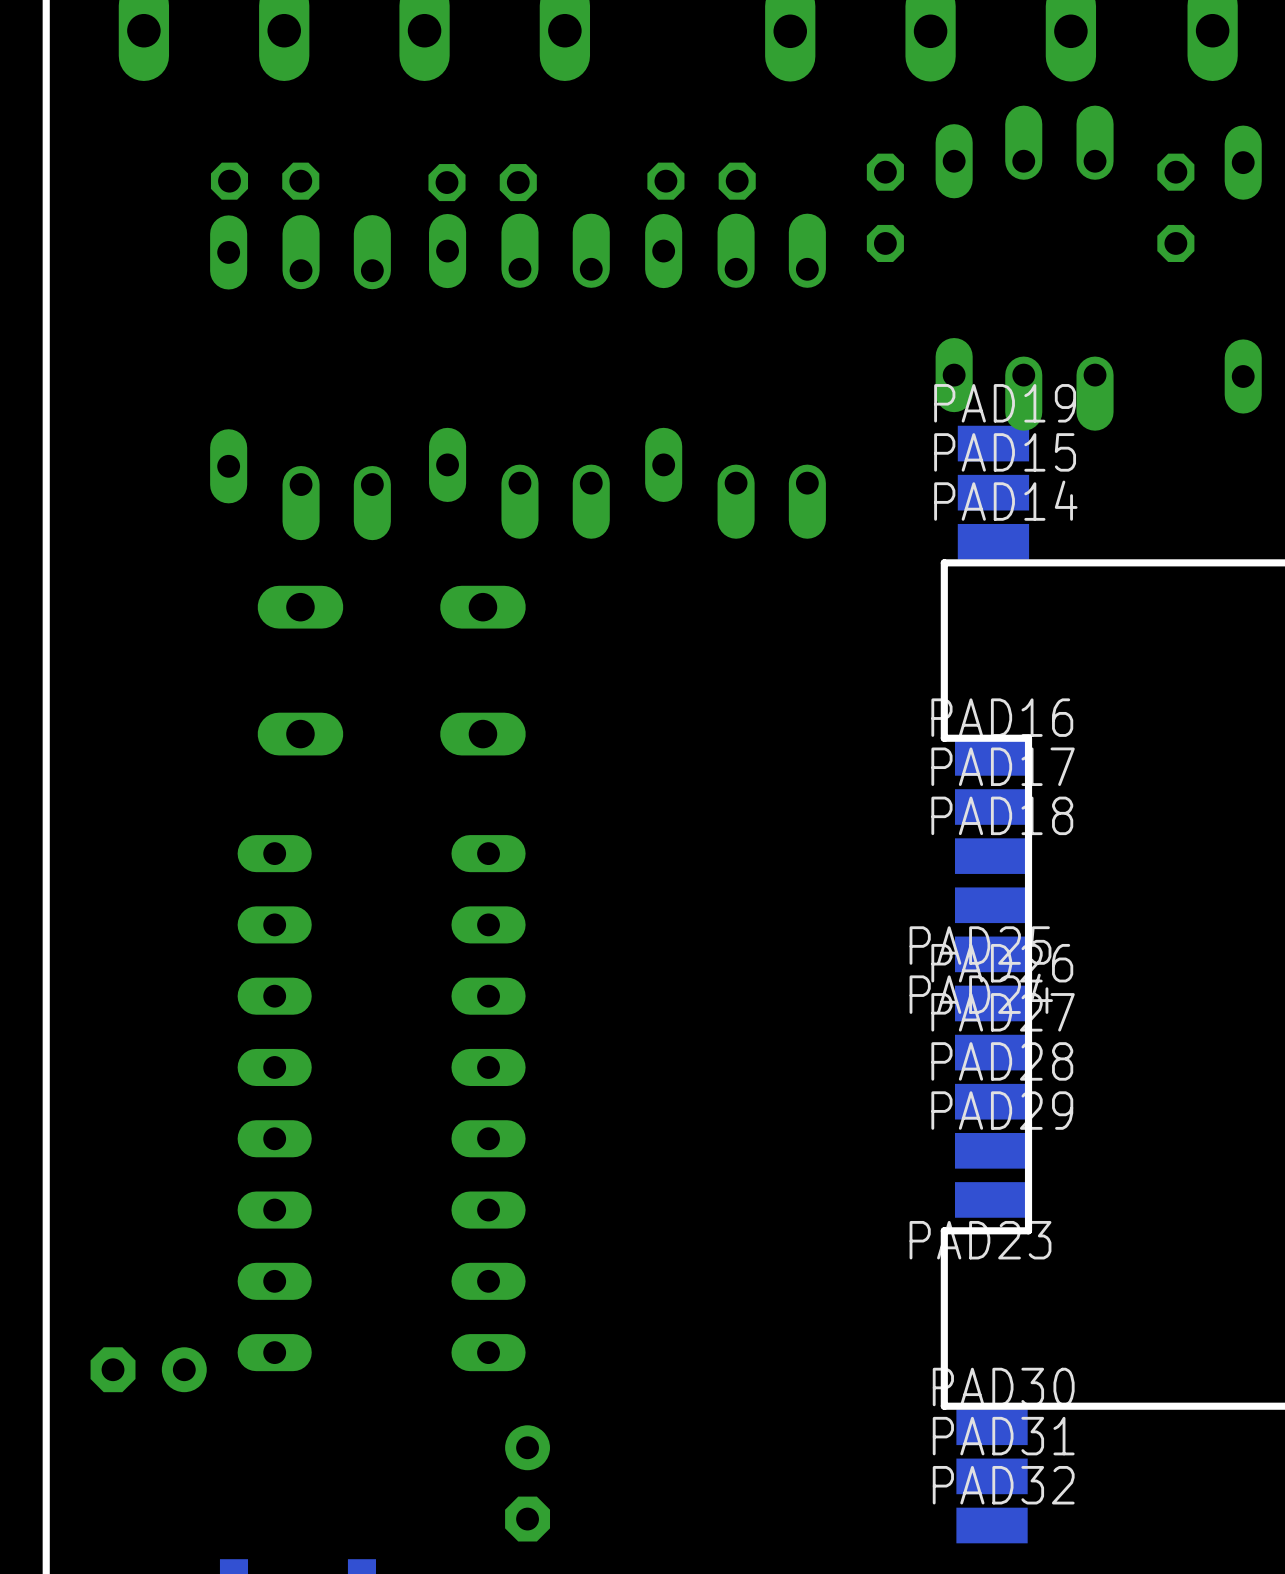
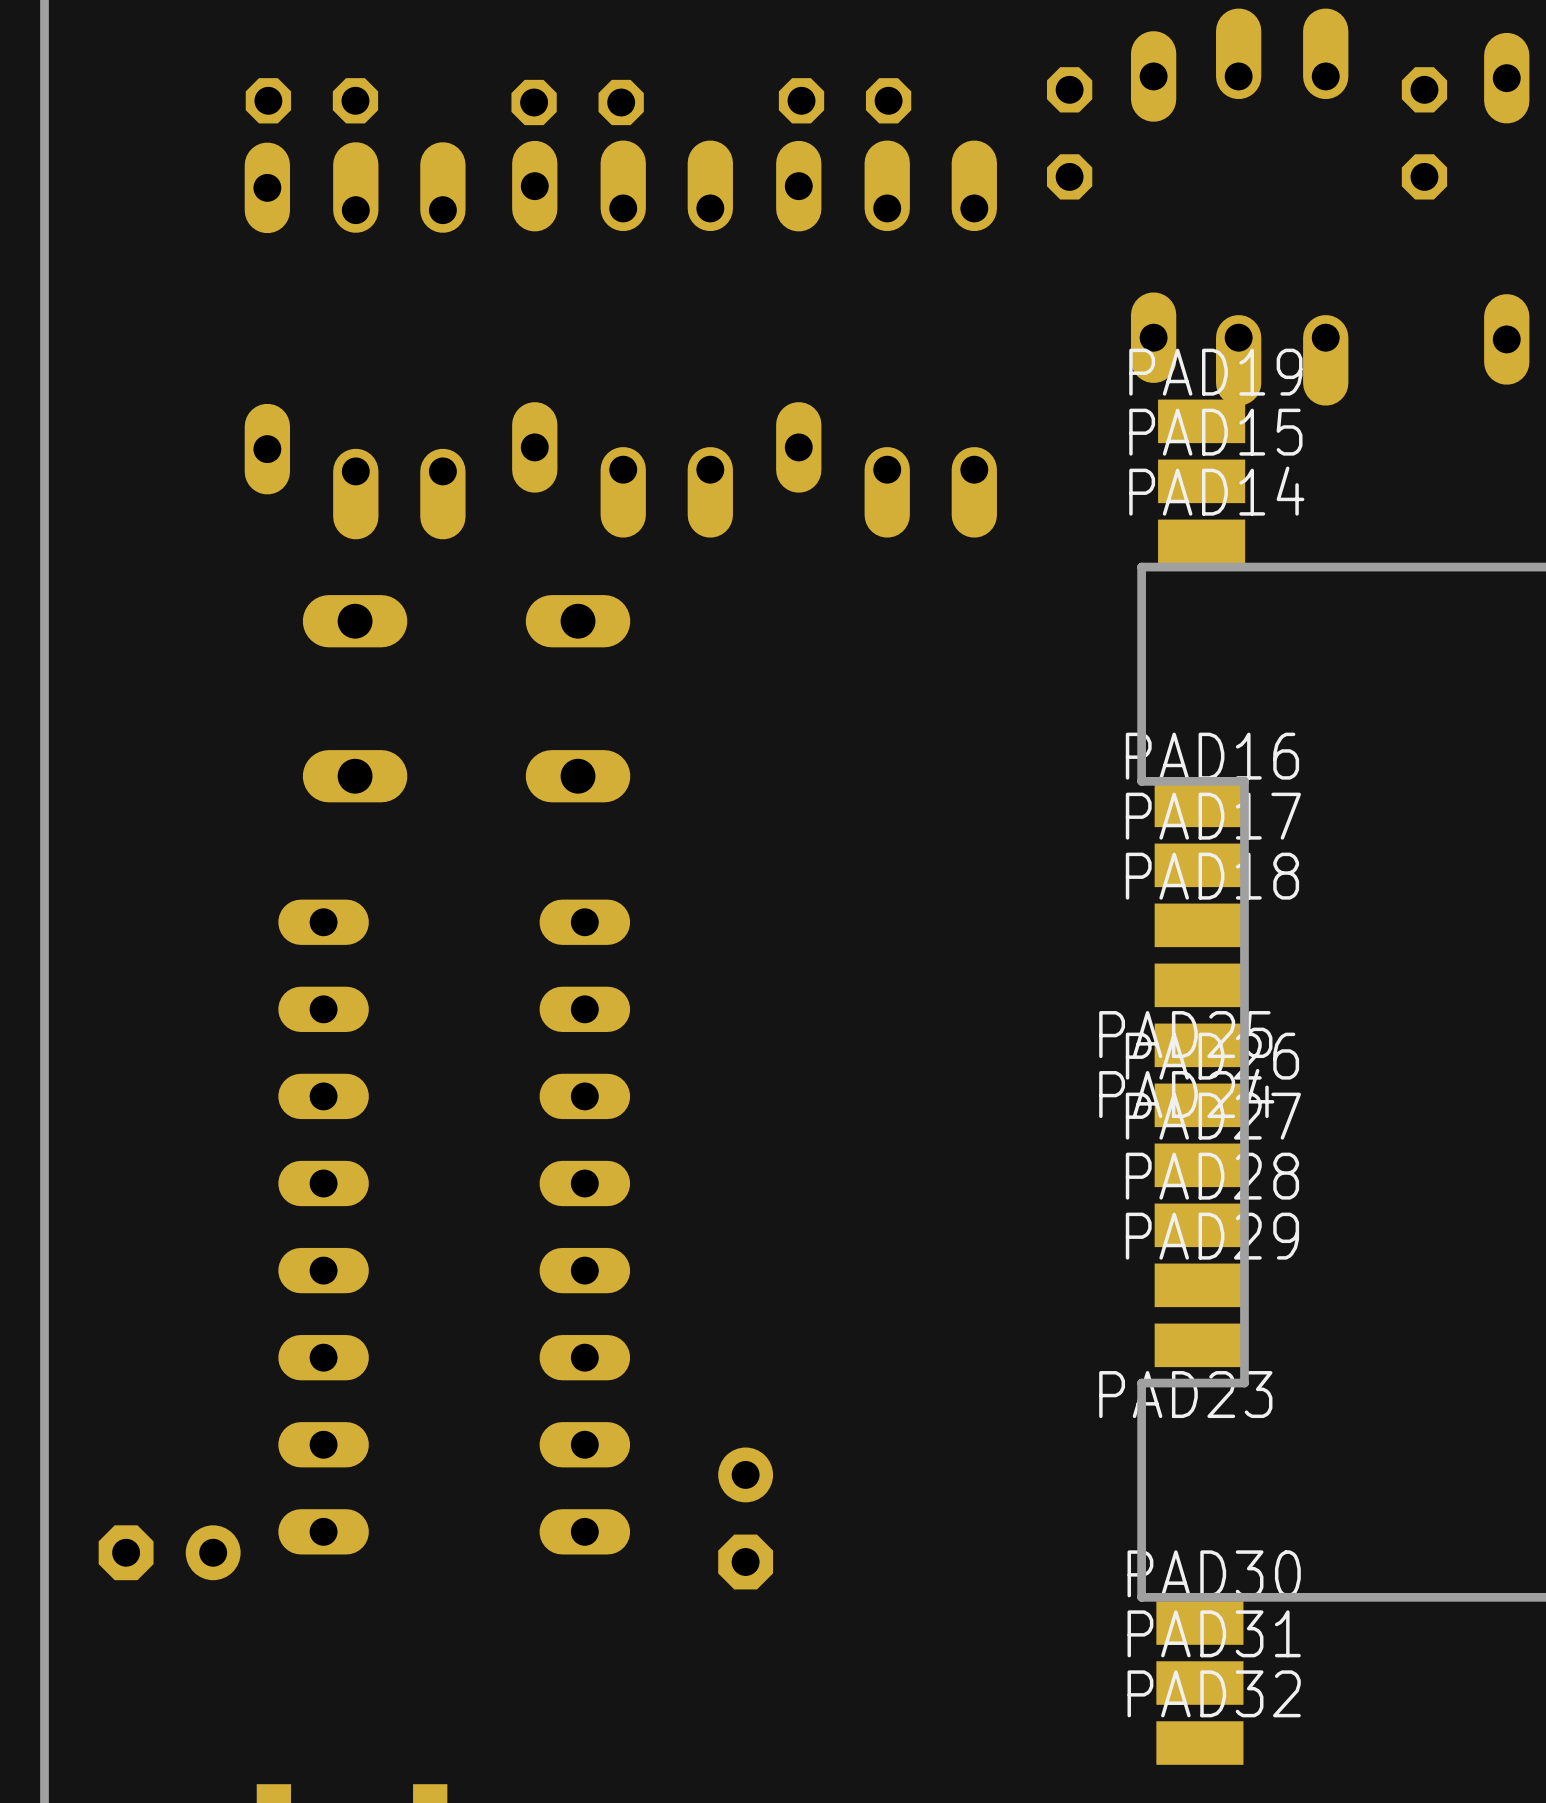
part position: (527, 1483) -> (745, 1518)

